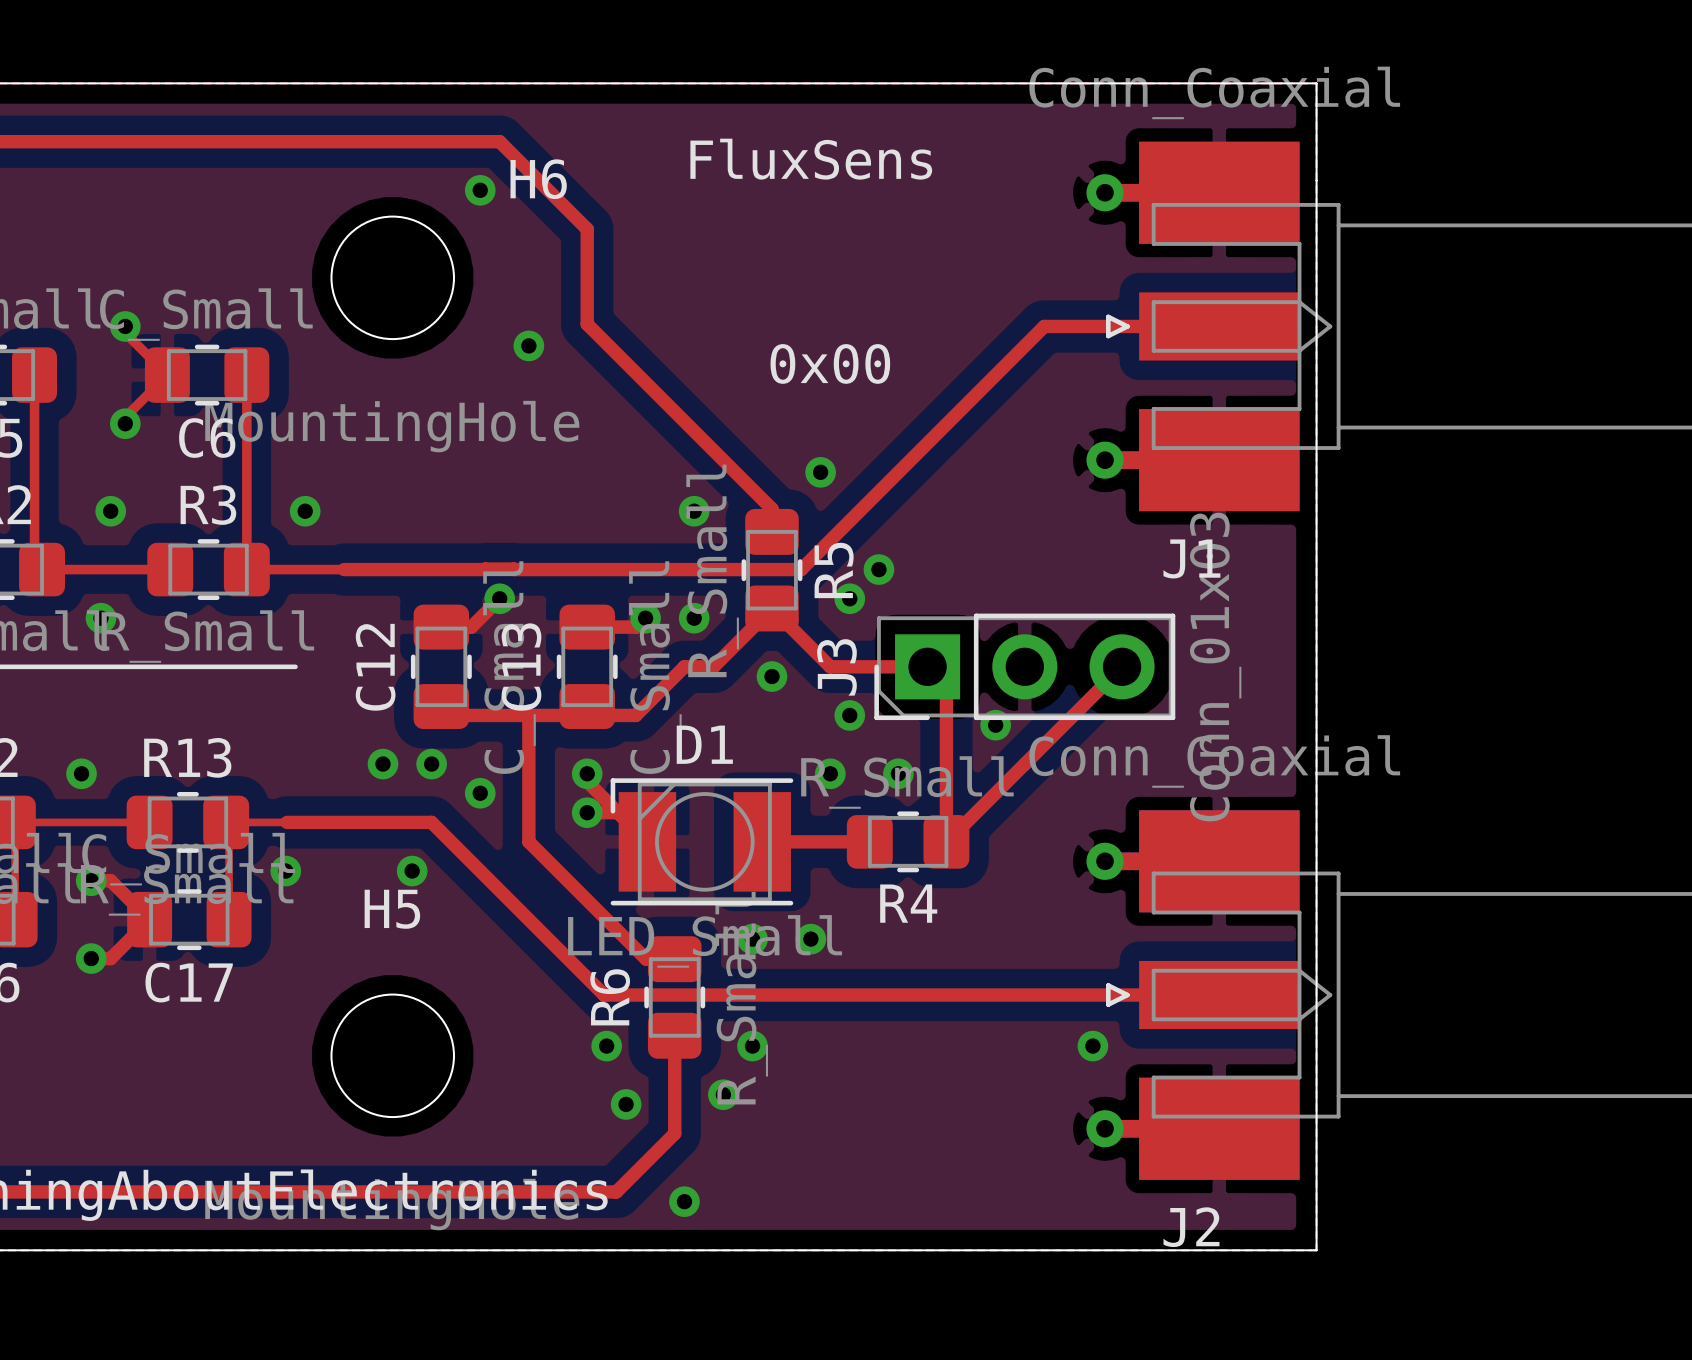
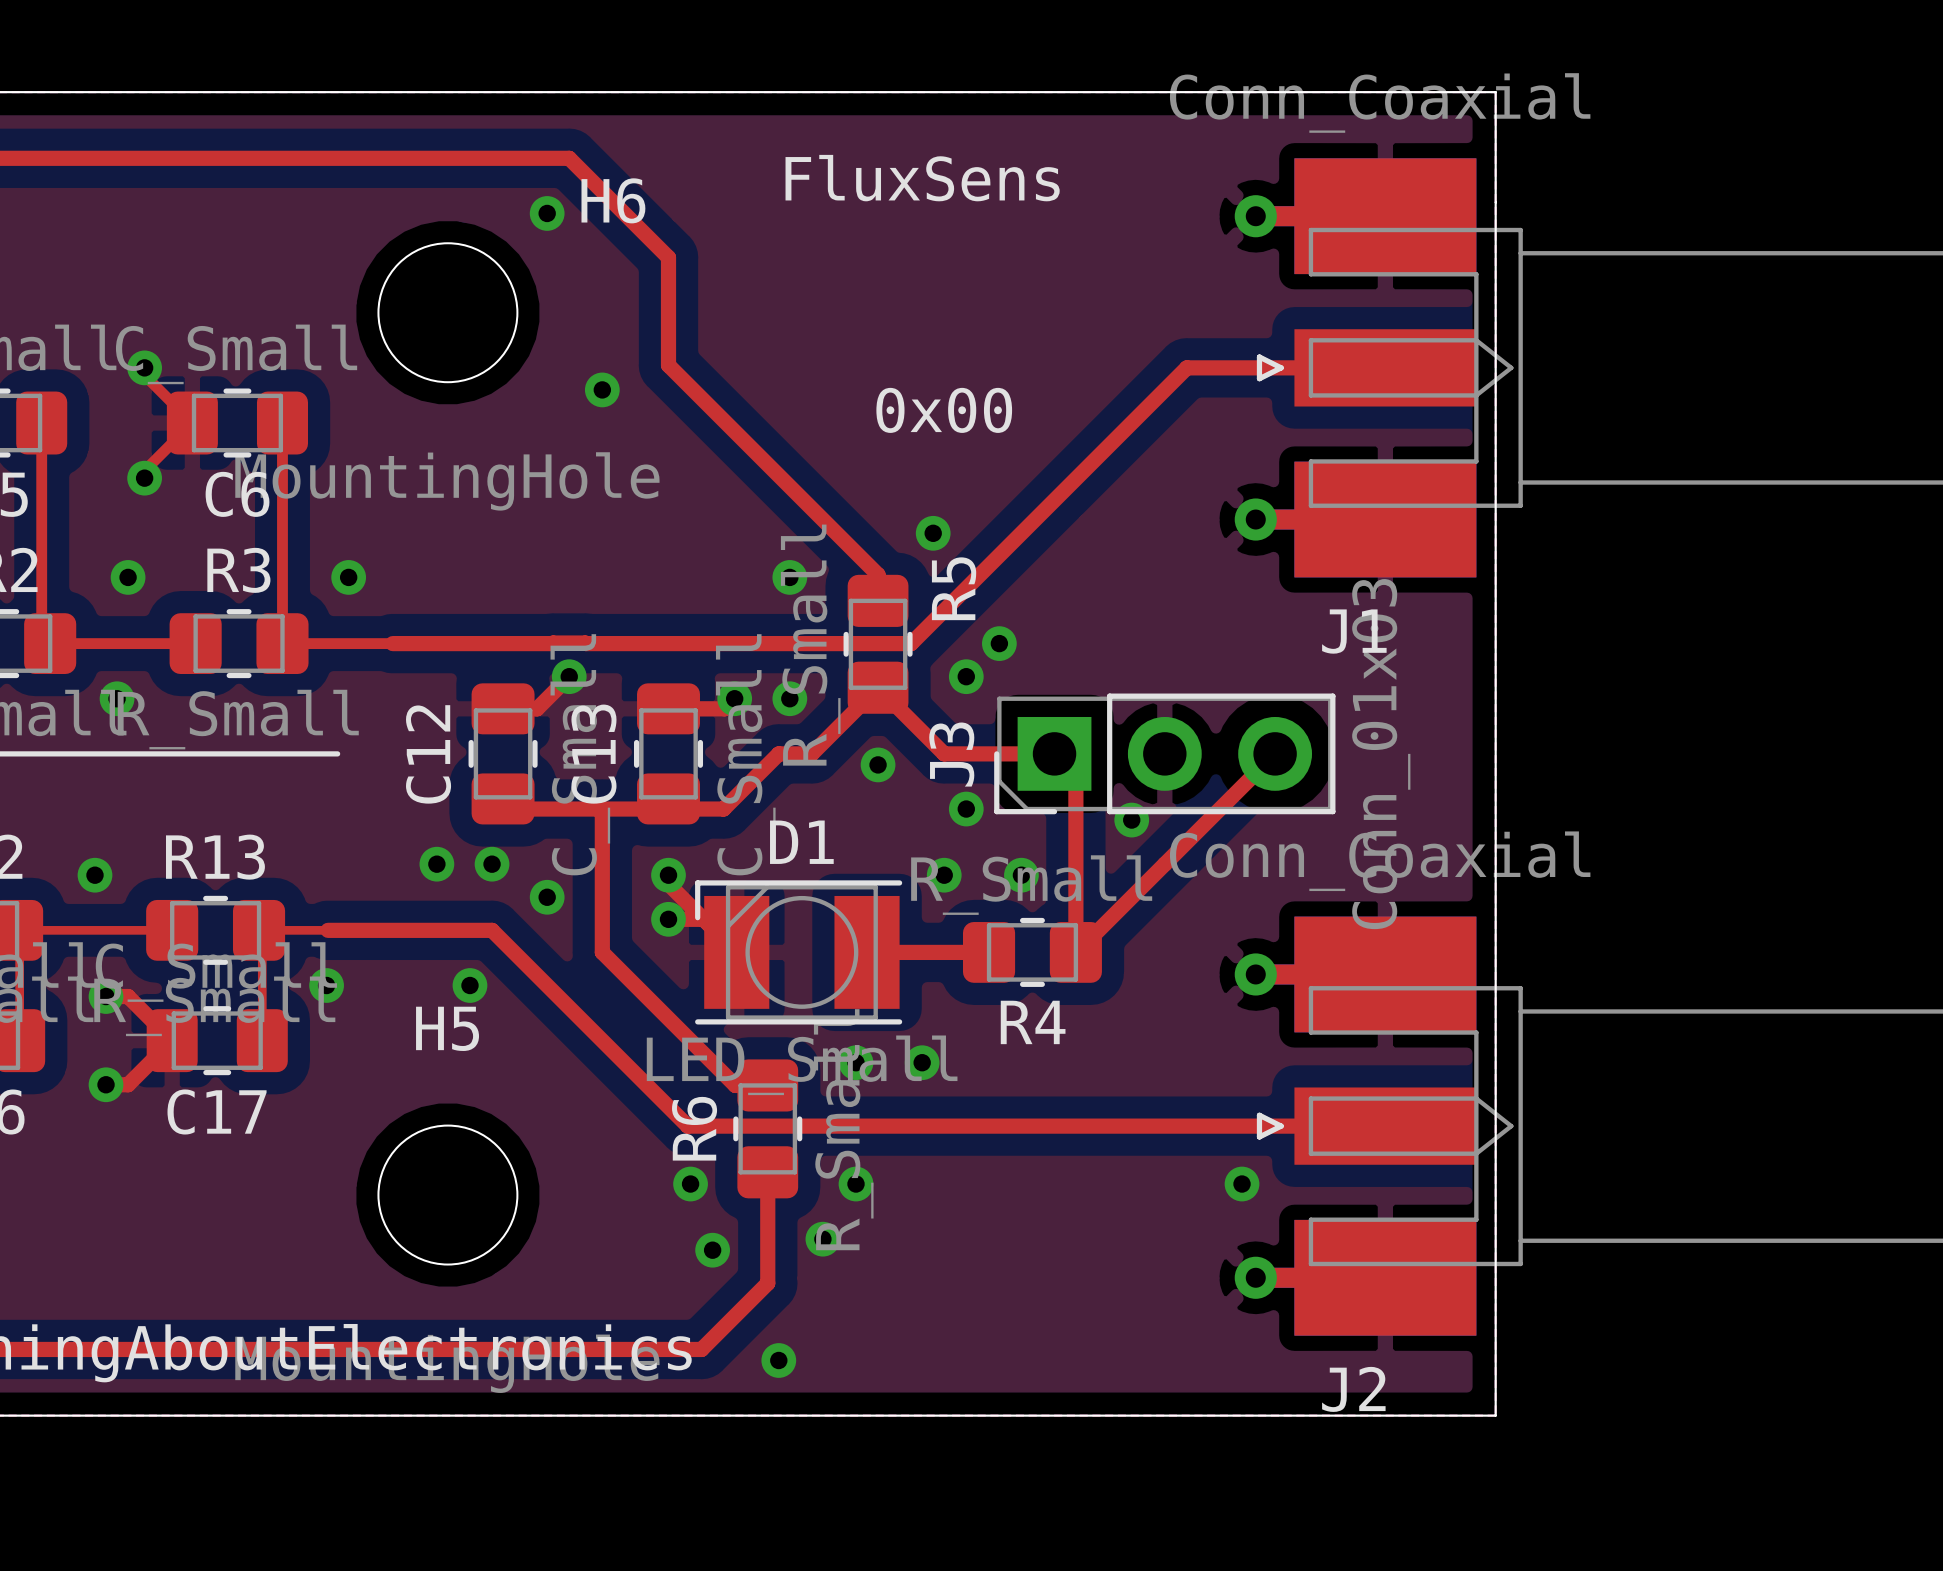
R5 name position: R5 (834, 570) -> R5 (954, 588)

